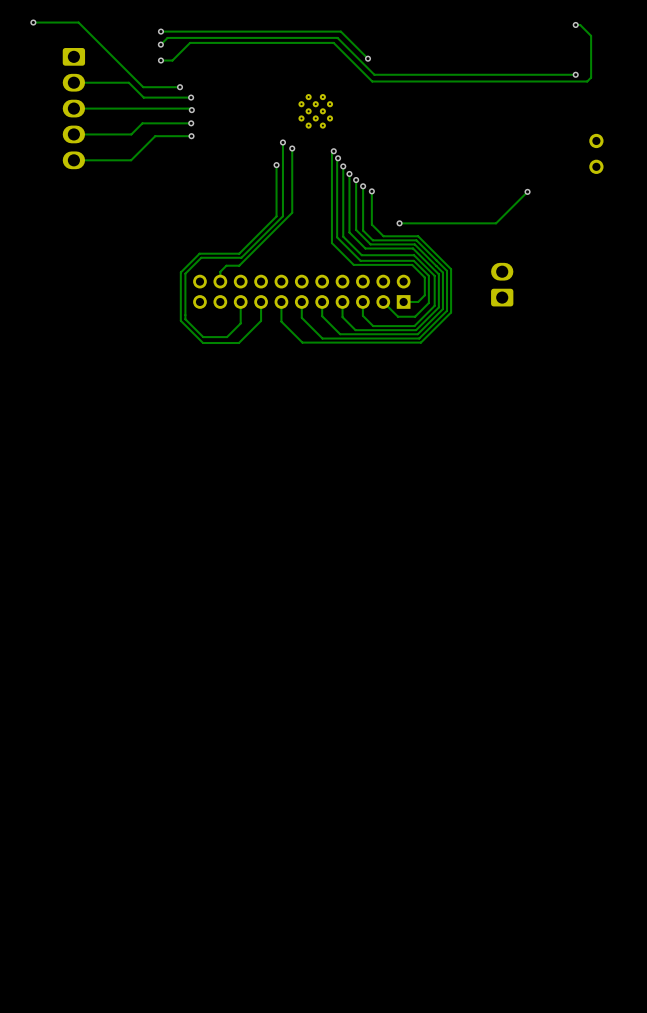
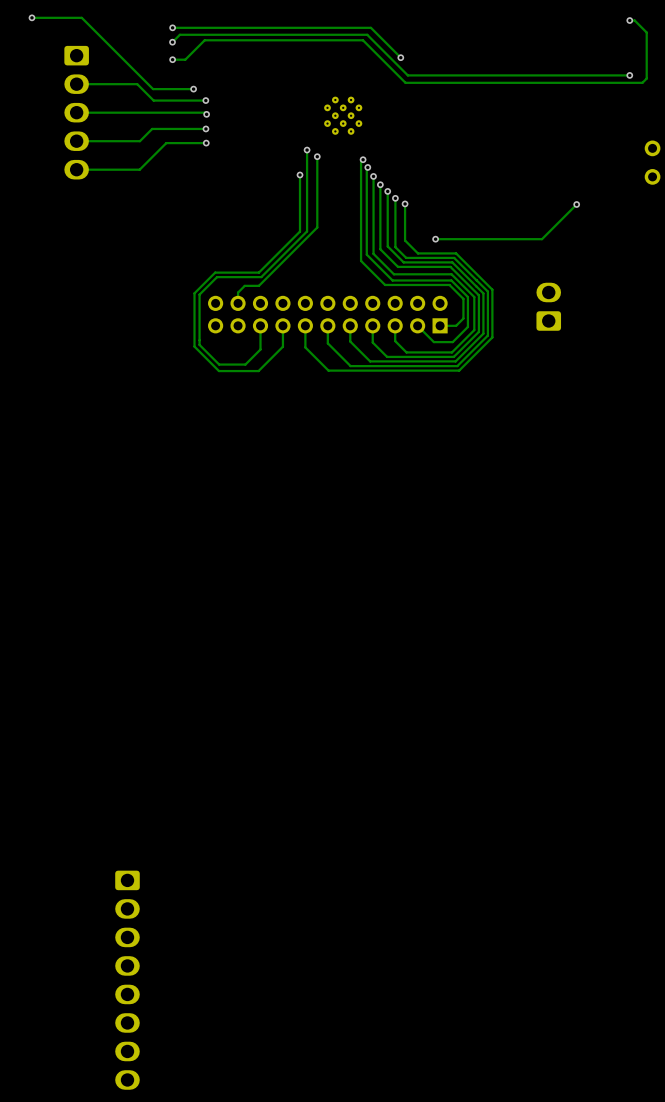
part: none -> (127, 980)

